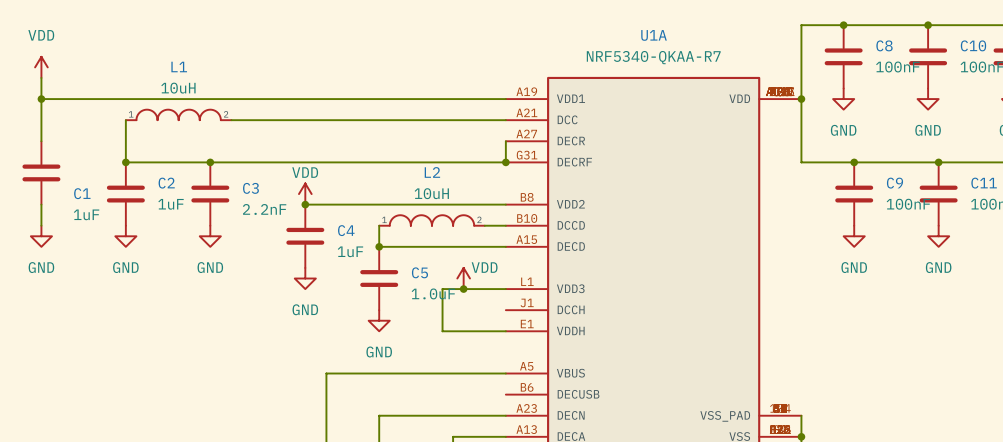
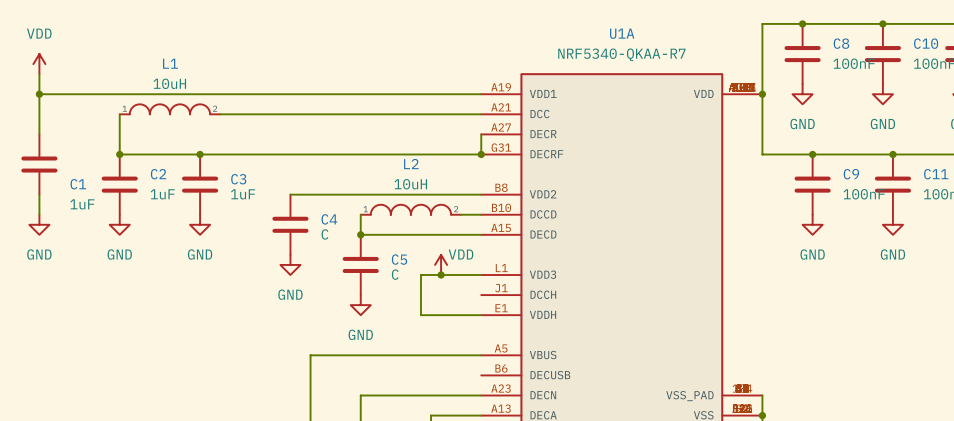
power symbol: VDD (305, 194) -> none
junction: (305, 204) -> none
C3 value: 2.2nF (264, 209) -> 1uF (243, 194)
C4 value: 1uF (350, 251) -> C (324, 234)
C5 value: 1.0uF (433, 293) -> C (395, 274)

